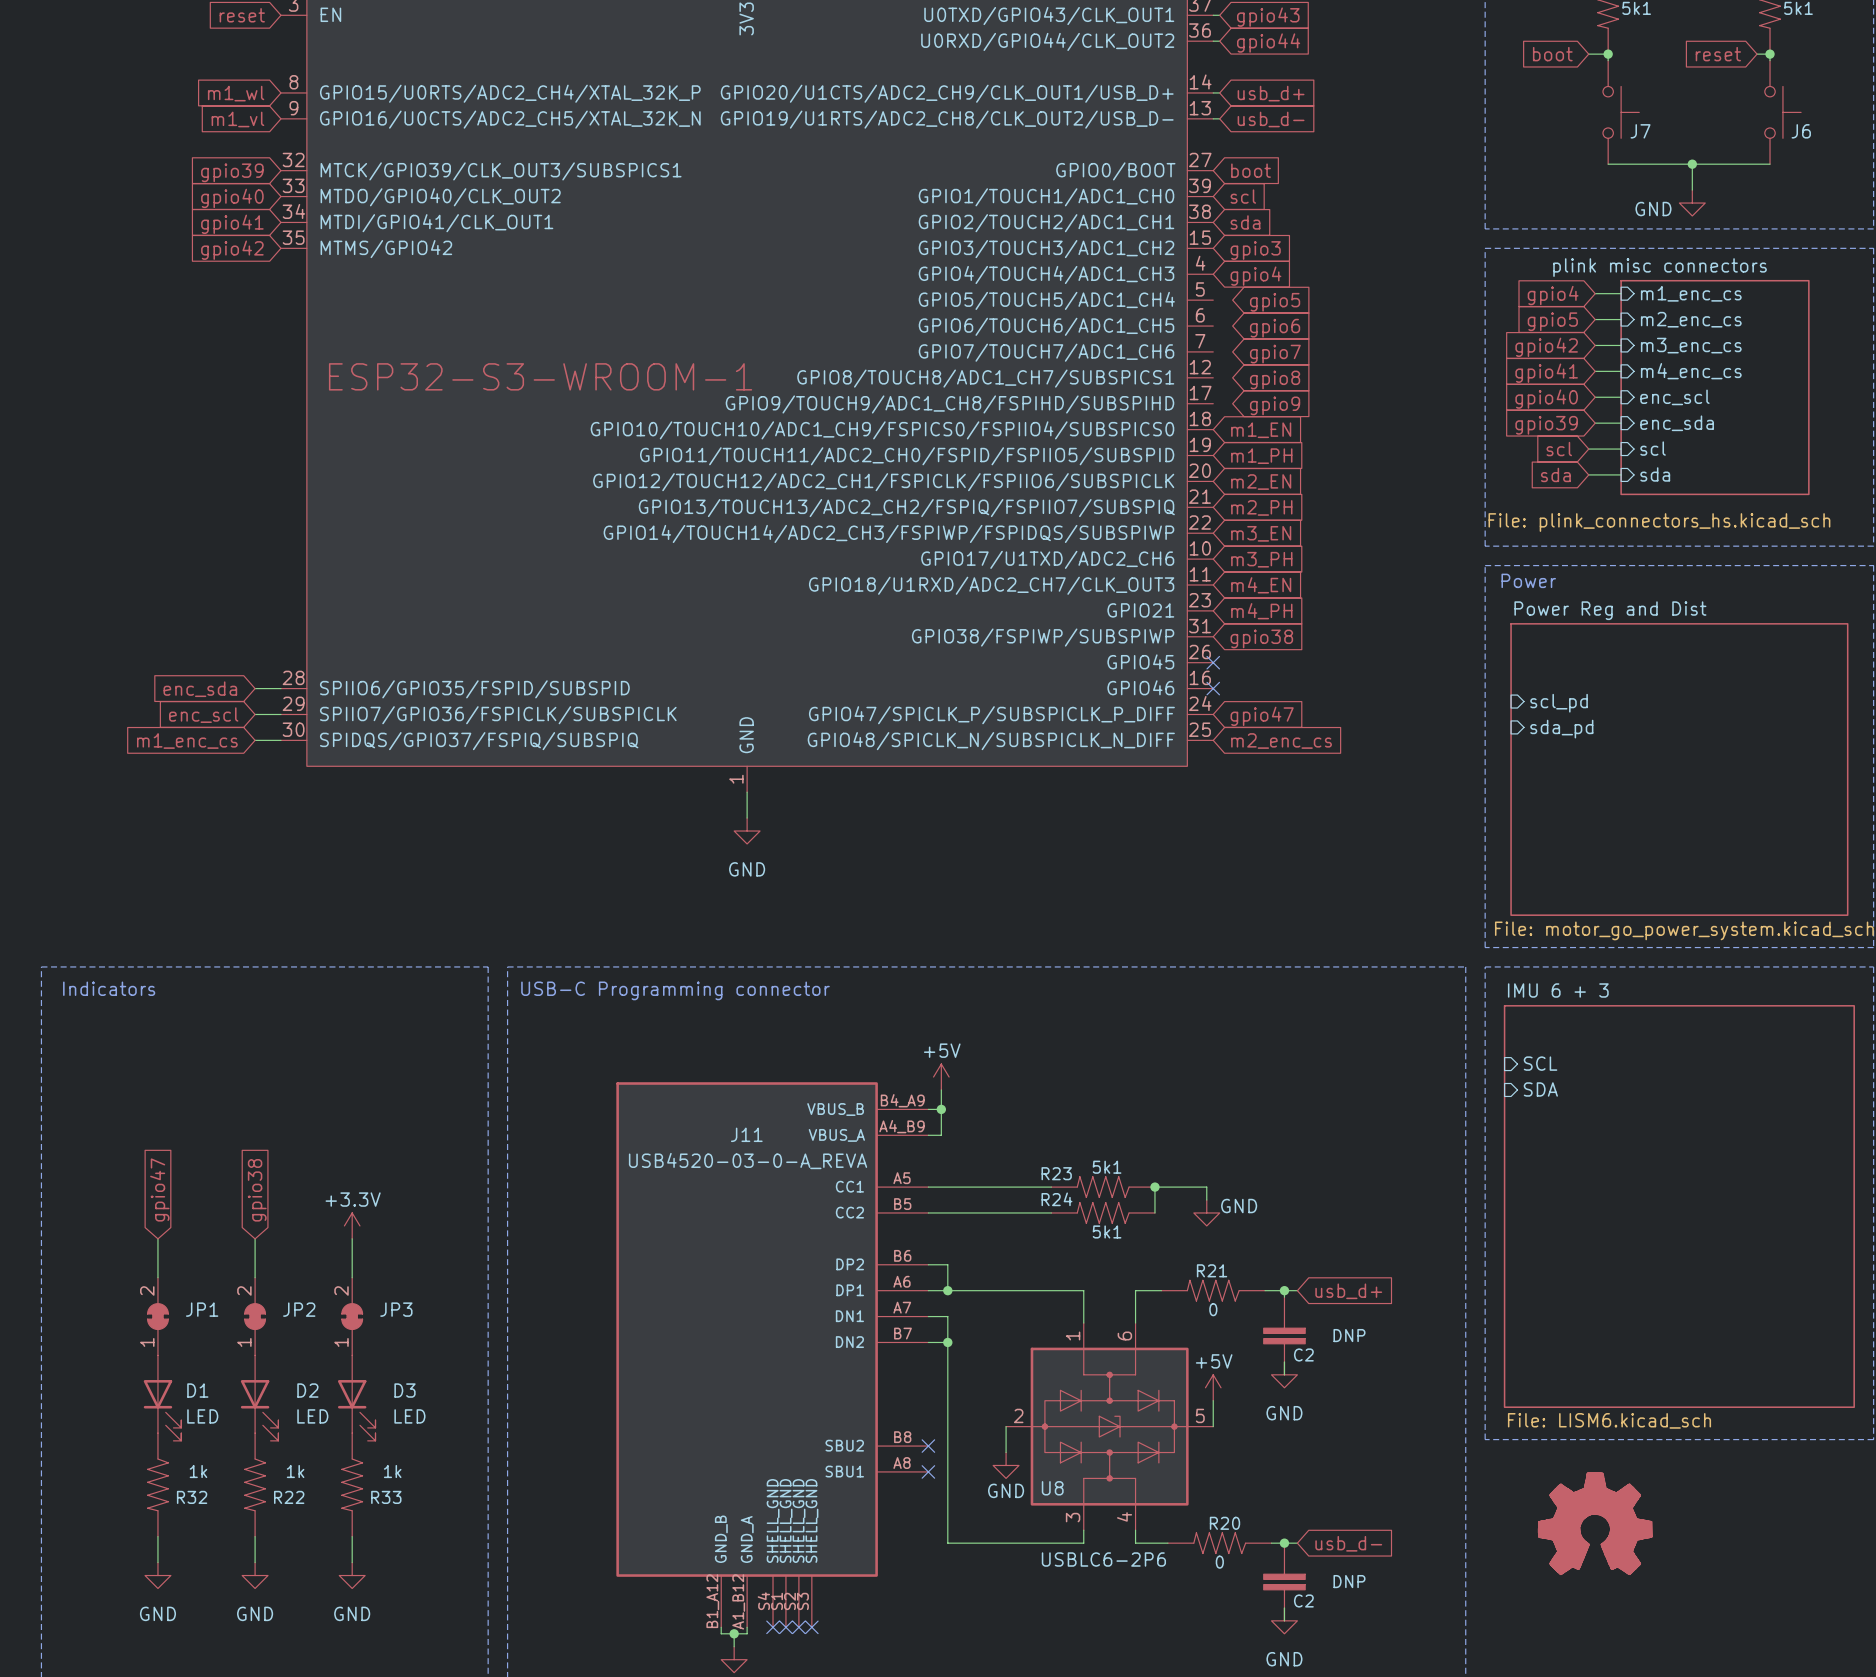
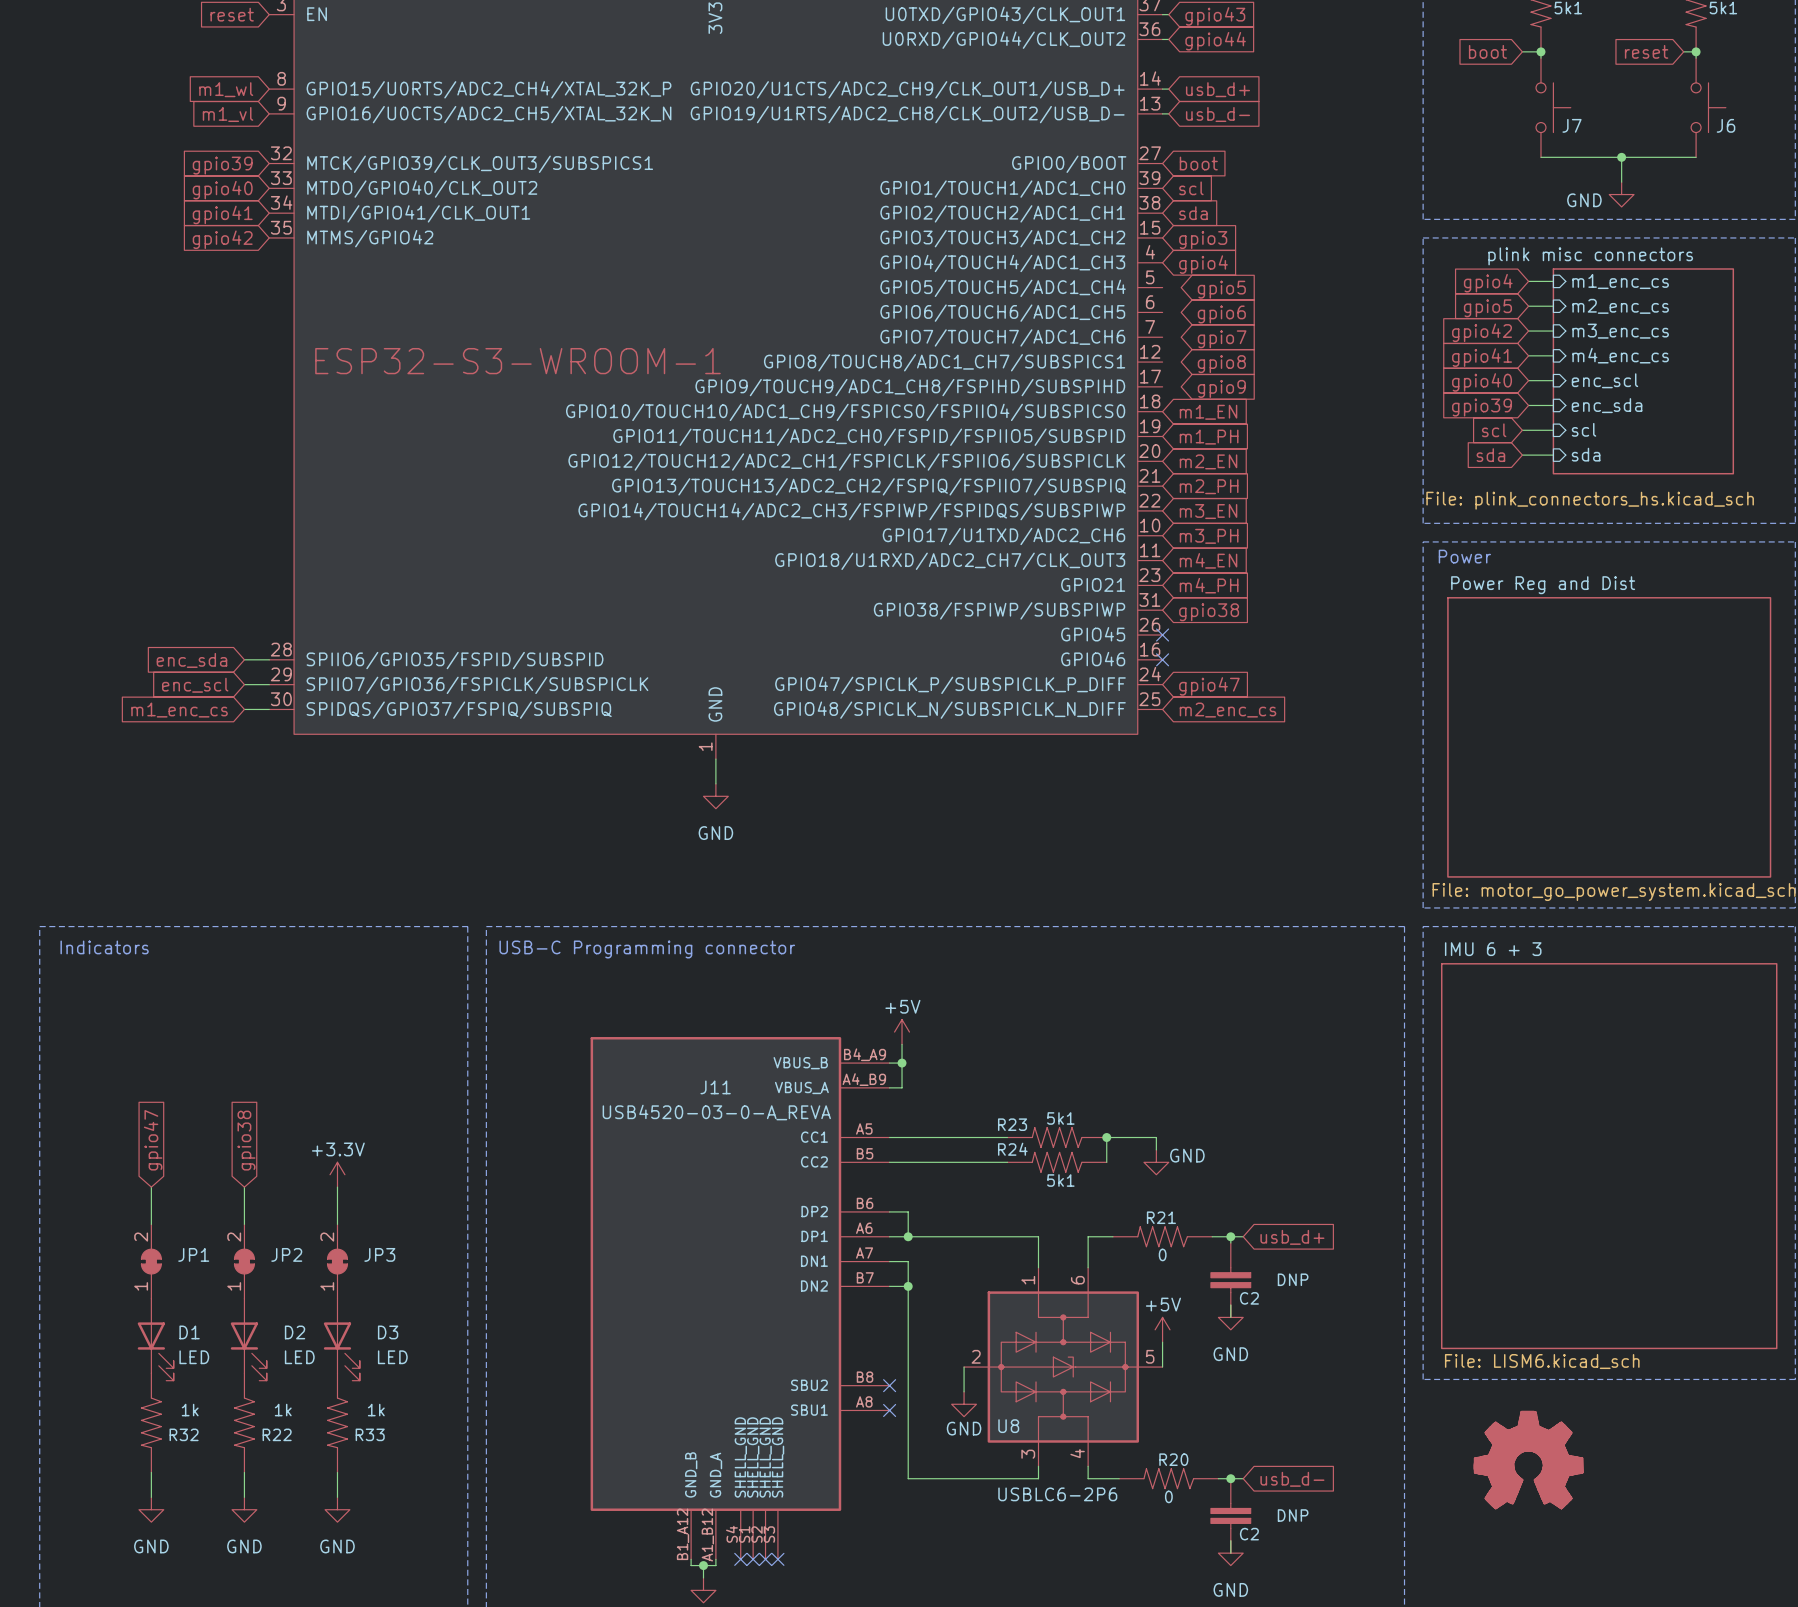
sheet pin: scl_pd (1559, 703) -> none
sheet pin: sda_pd (1561, 729) -> none
sheet pin: SCL (1540, 1063) -> none
sheet pin: SDA (1540, 1089) -> none

